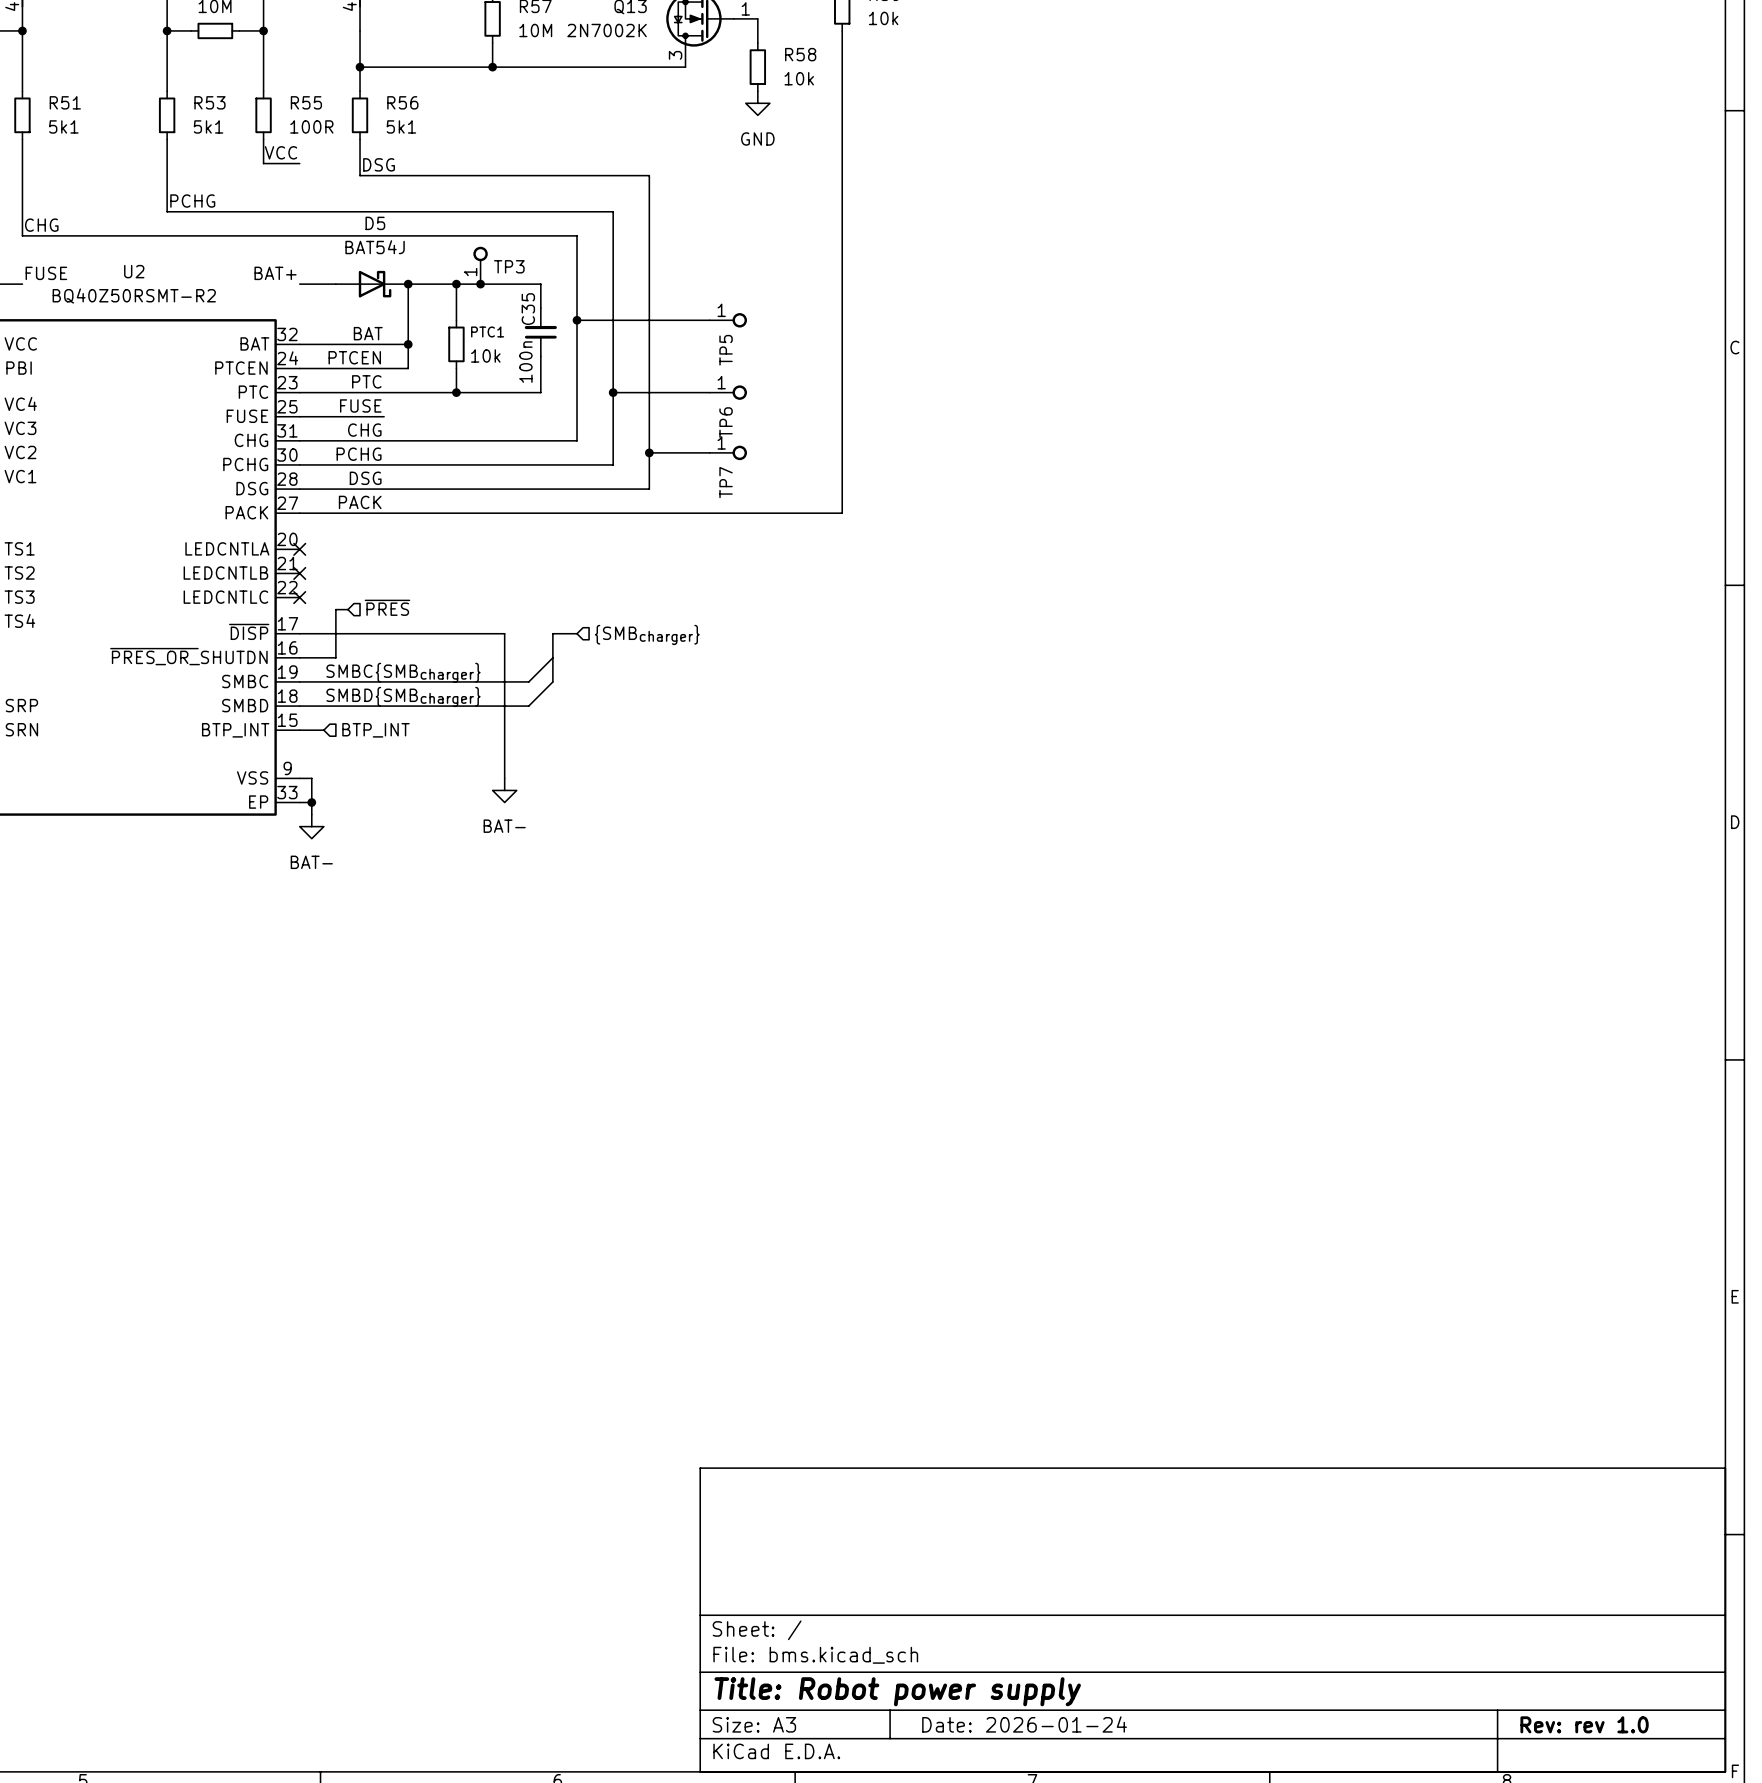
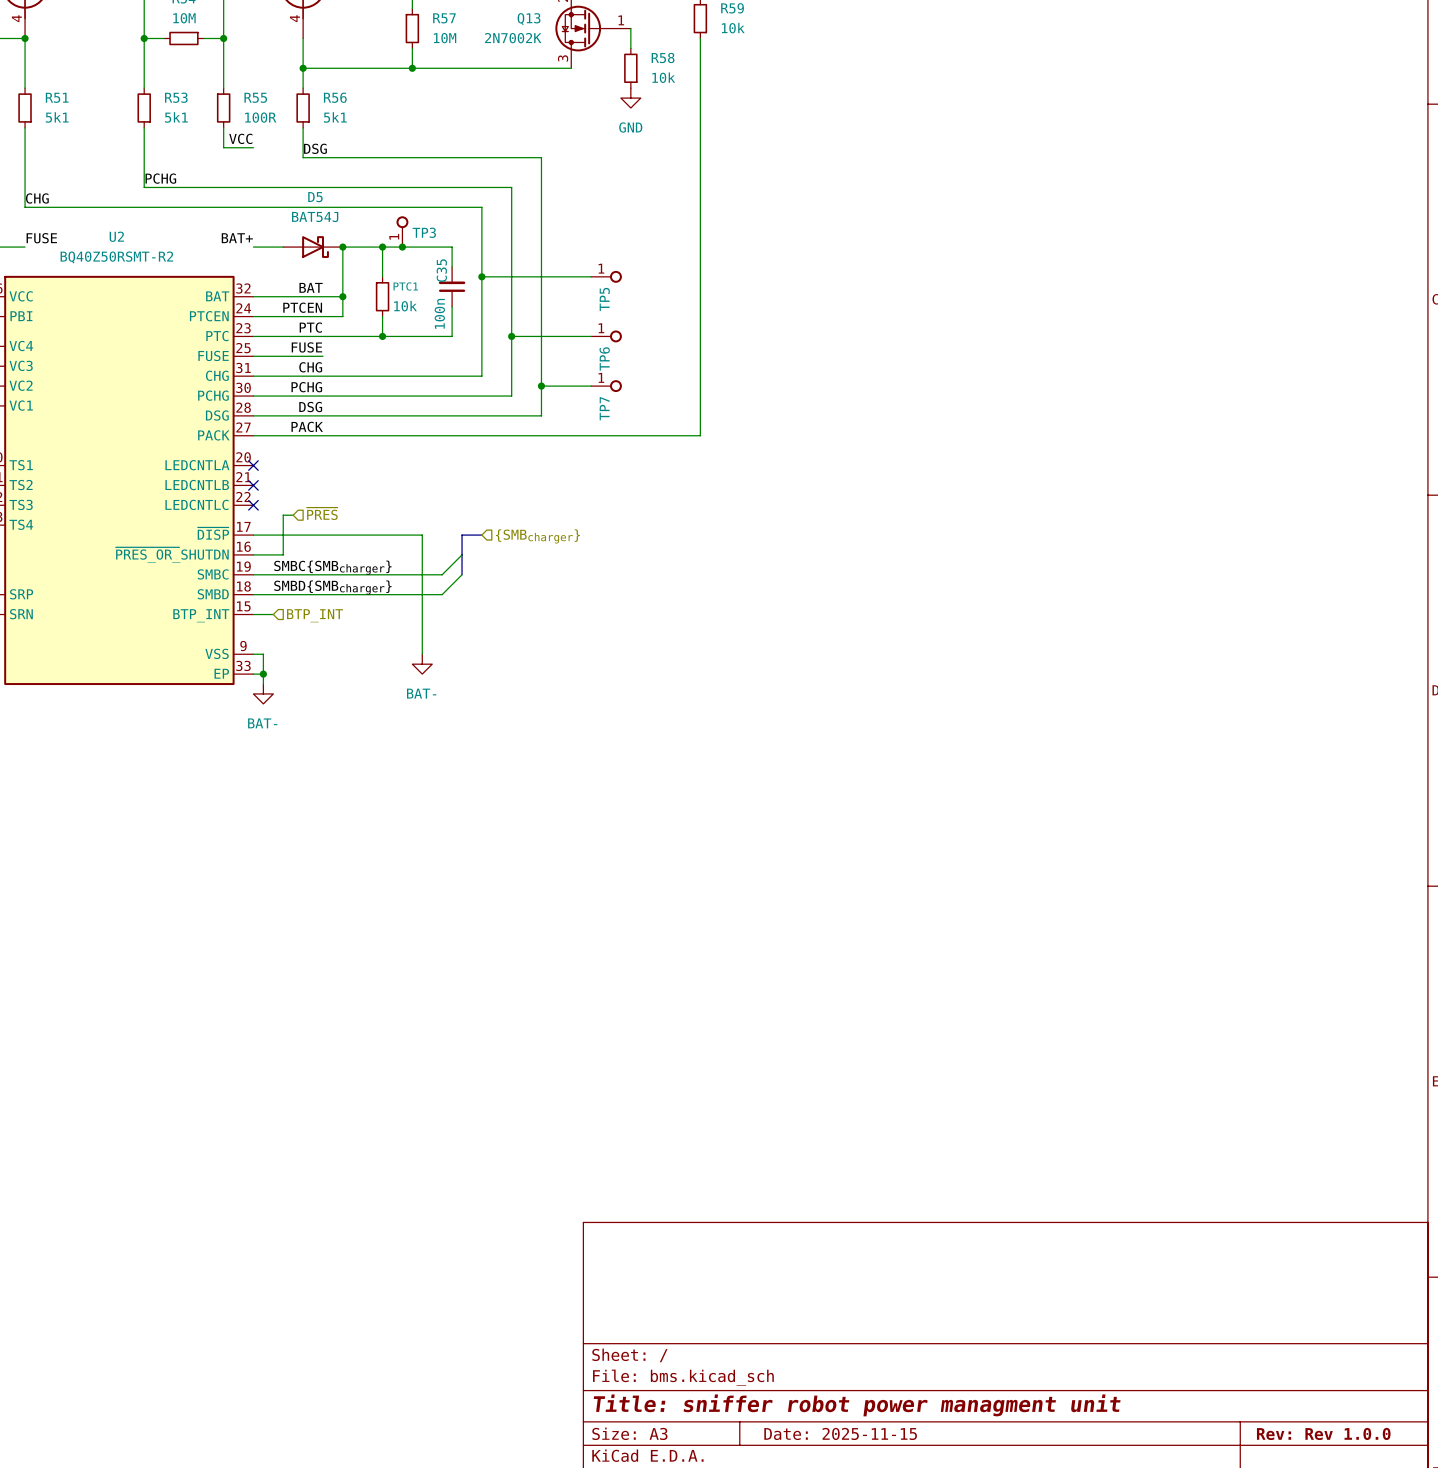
title block: Title: Robot power supply (897, 1691) -> Title: sniffer robot power managment unit (857, 1405)
title block: Date: 2026-01-24 (1024, 1724) -> Date: 2025-11-15 (840, 1433)
title block: Rev: rev 1.0 (1584, 1724) -> Rev: Rev 1.0.0 (1323, 1433)

